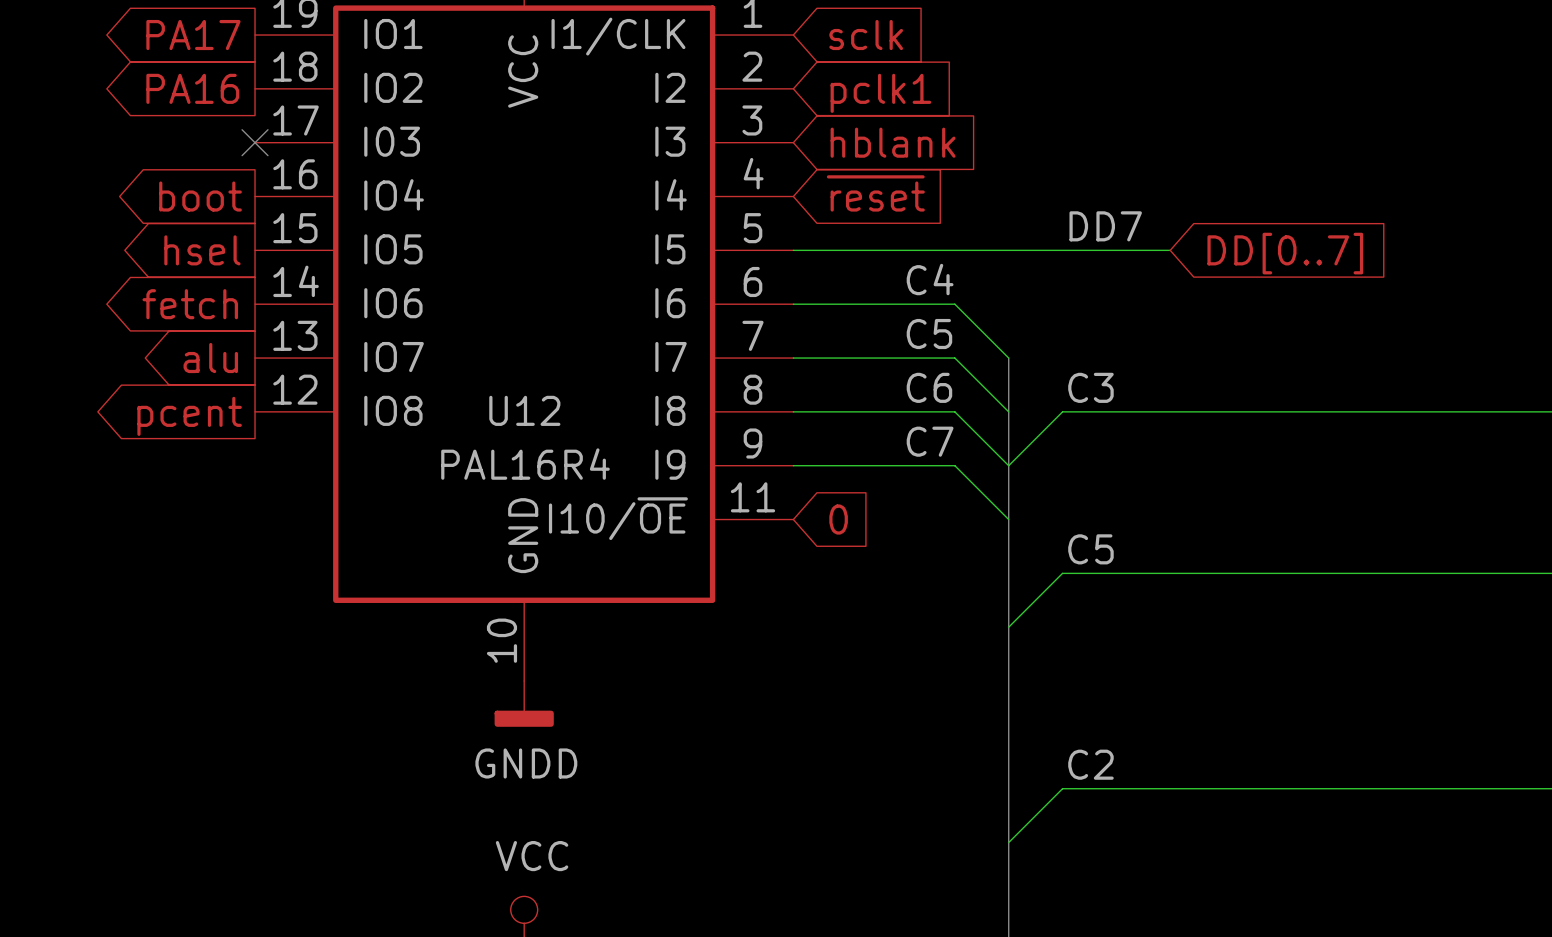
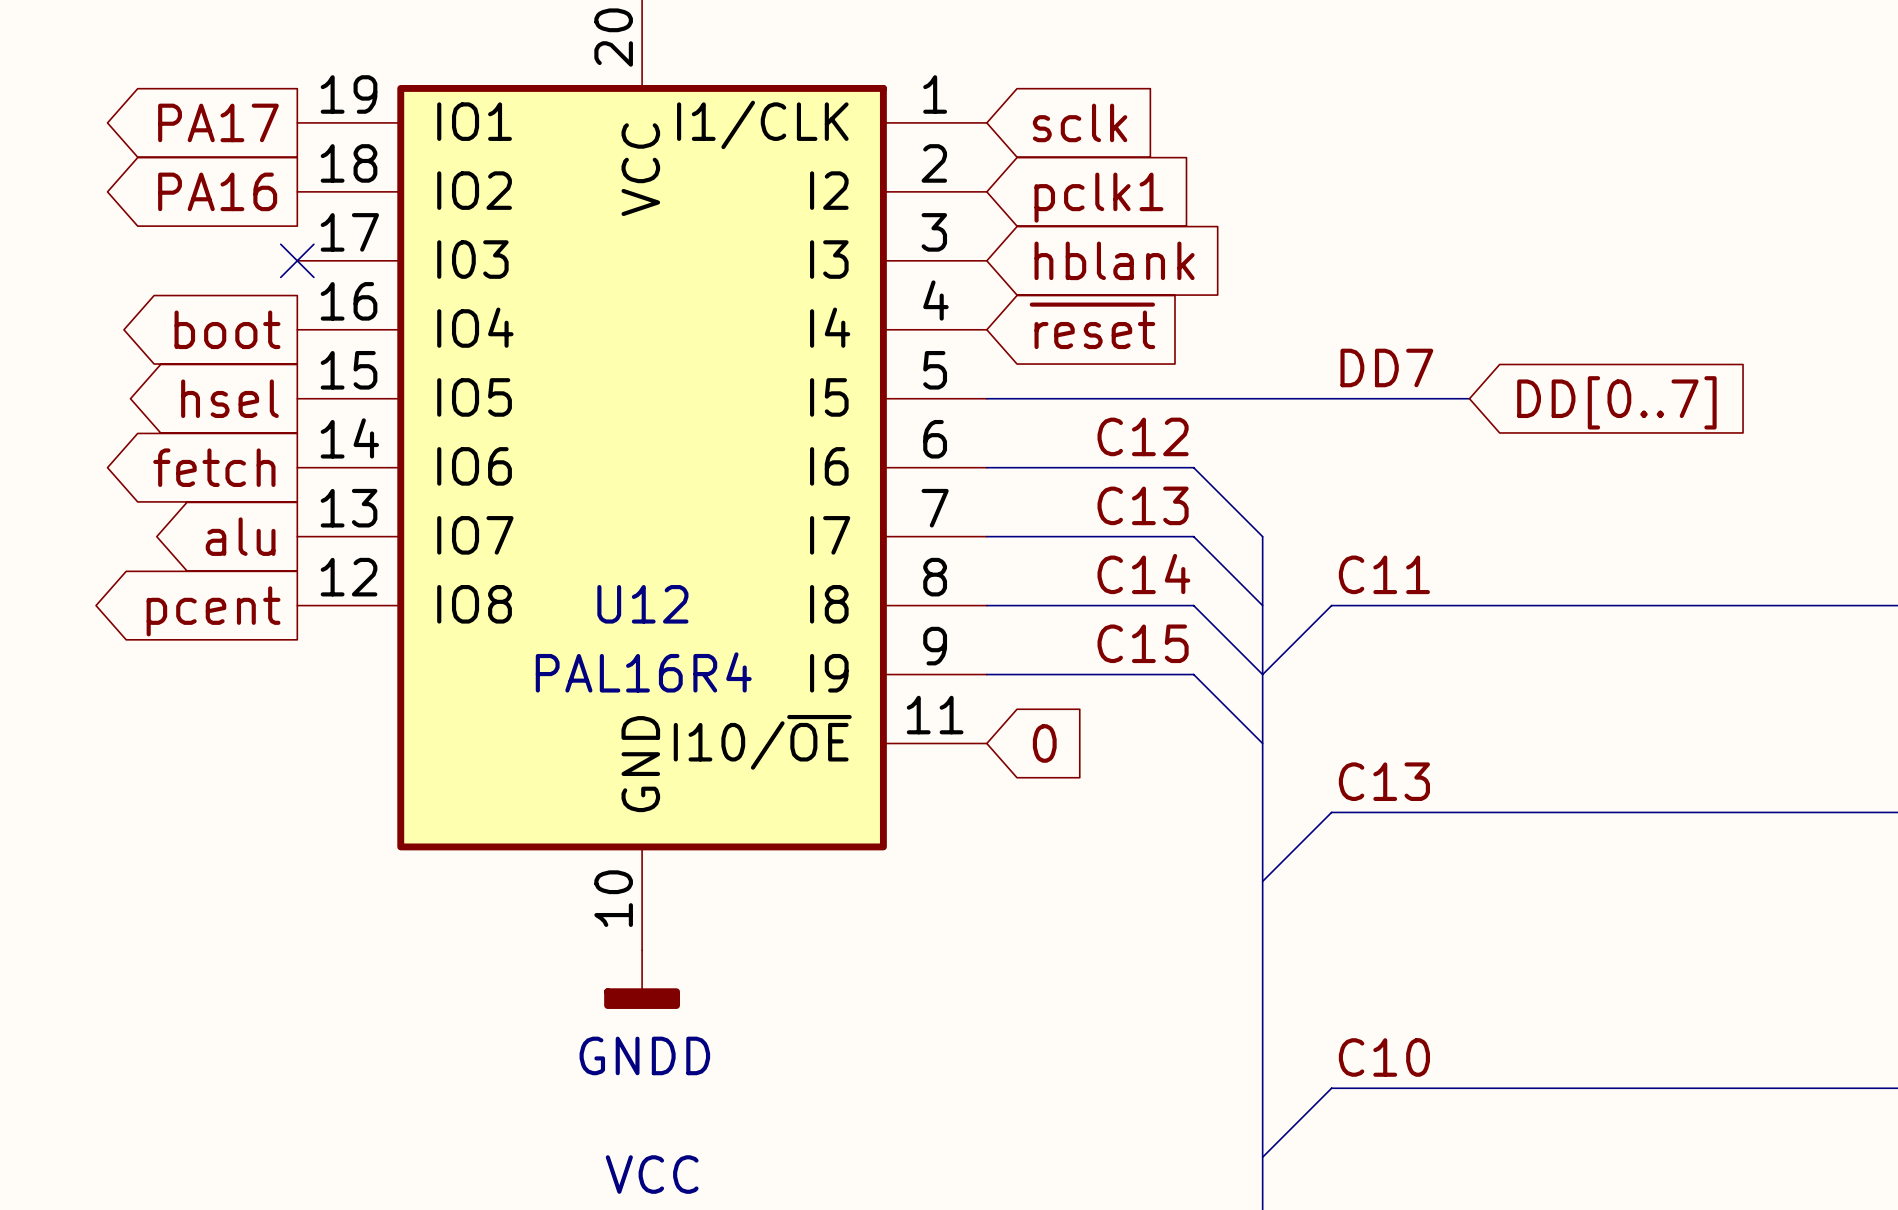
label: C4 (930, 279) -> none
label: none -> C12 (1143, 436)
label: none -> C13 (1143, 505)
label: C5 (929, 334) -> none
label: none -> C14 (1143, 574)
label: C6 (929, 387) -> none
label: C3 (1090, 387) -> C11 (1384, 574)
label: none -> C15 (1143, 643)
label: C7 (930, 441) -> none
label: C5 (1090, 549) -> C13 (1384, 781)
label: C2 (1090, 764) -> C10 (1384, 1057)

